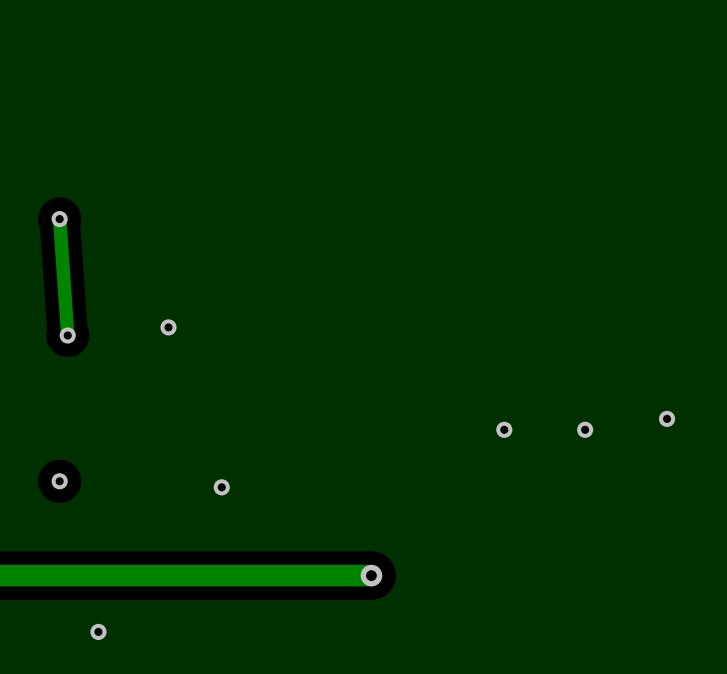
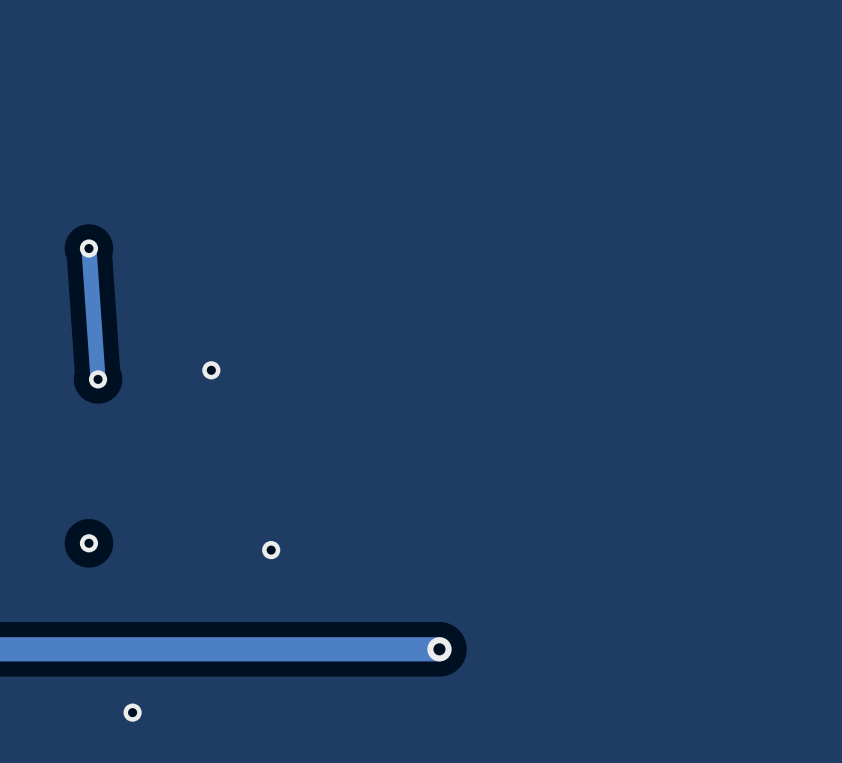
via: (667, 418) -> none
via: (504, 429) -> none
via: (585, 429) -> none

